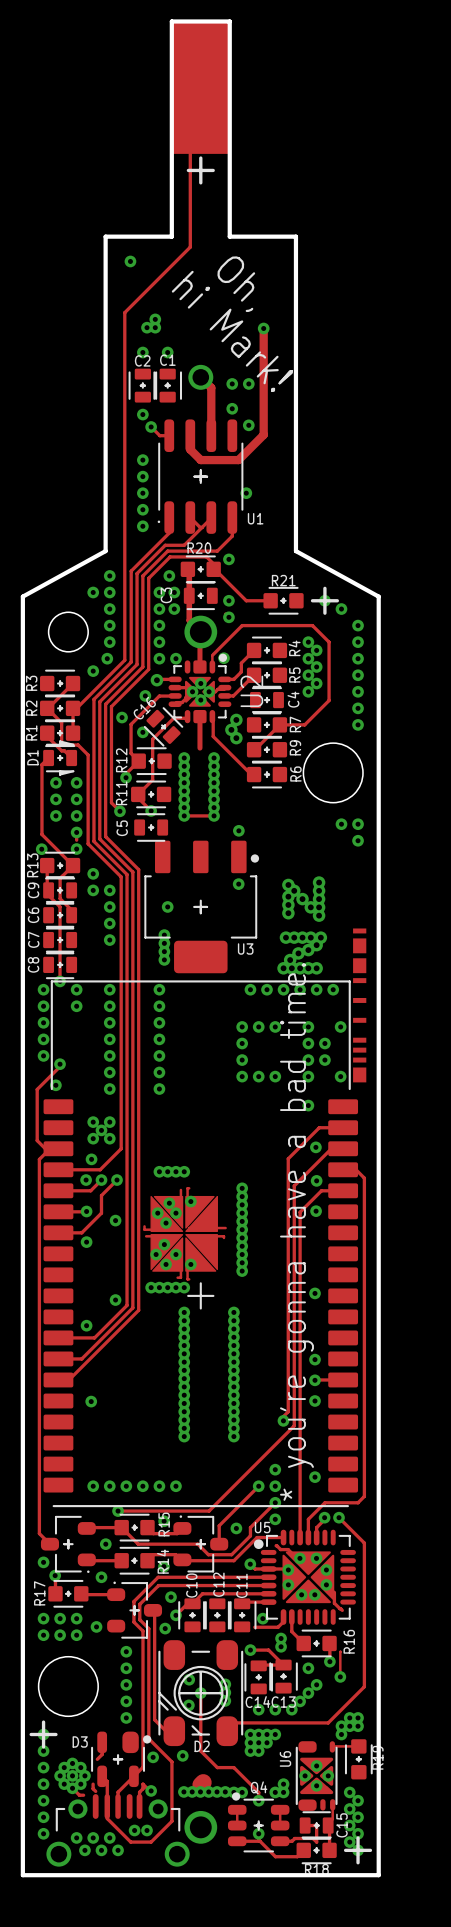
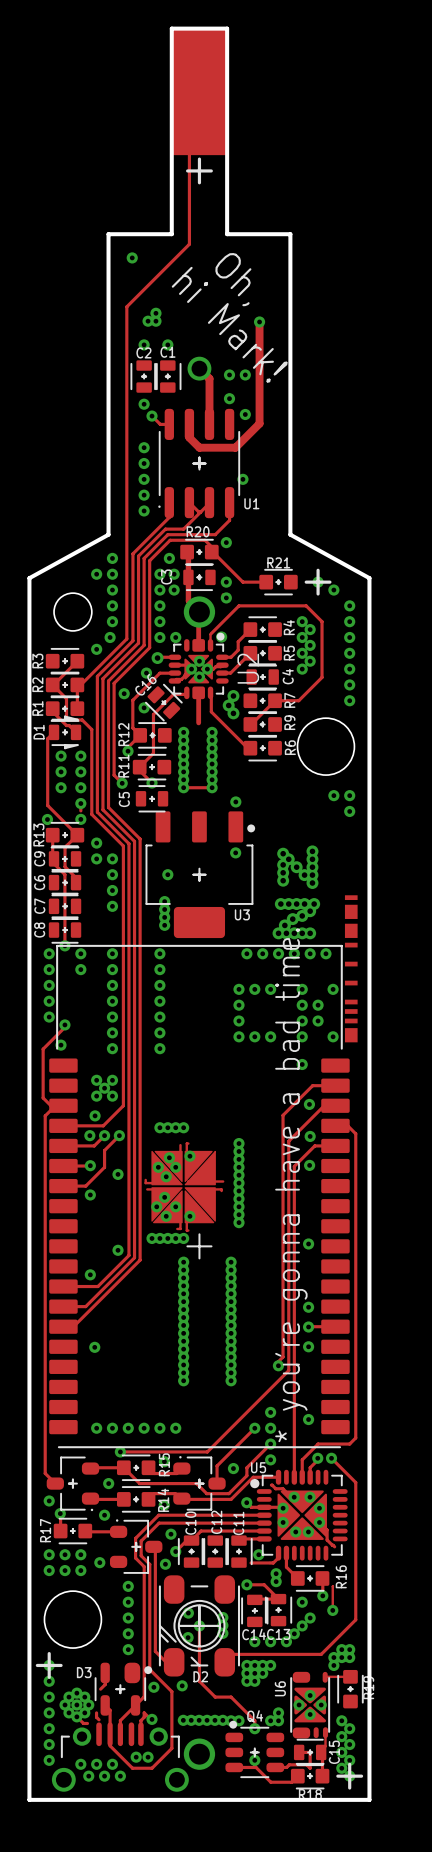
track: (203, 1782) (200, 1784) -> none
track: (237, 1809) (237, 1825) -> none
track: (280, 1809) (280, 1825) -> none

